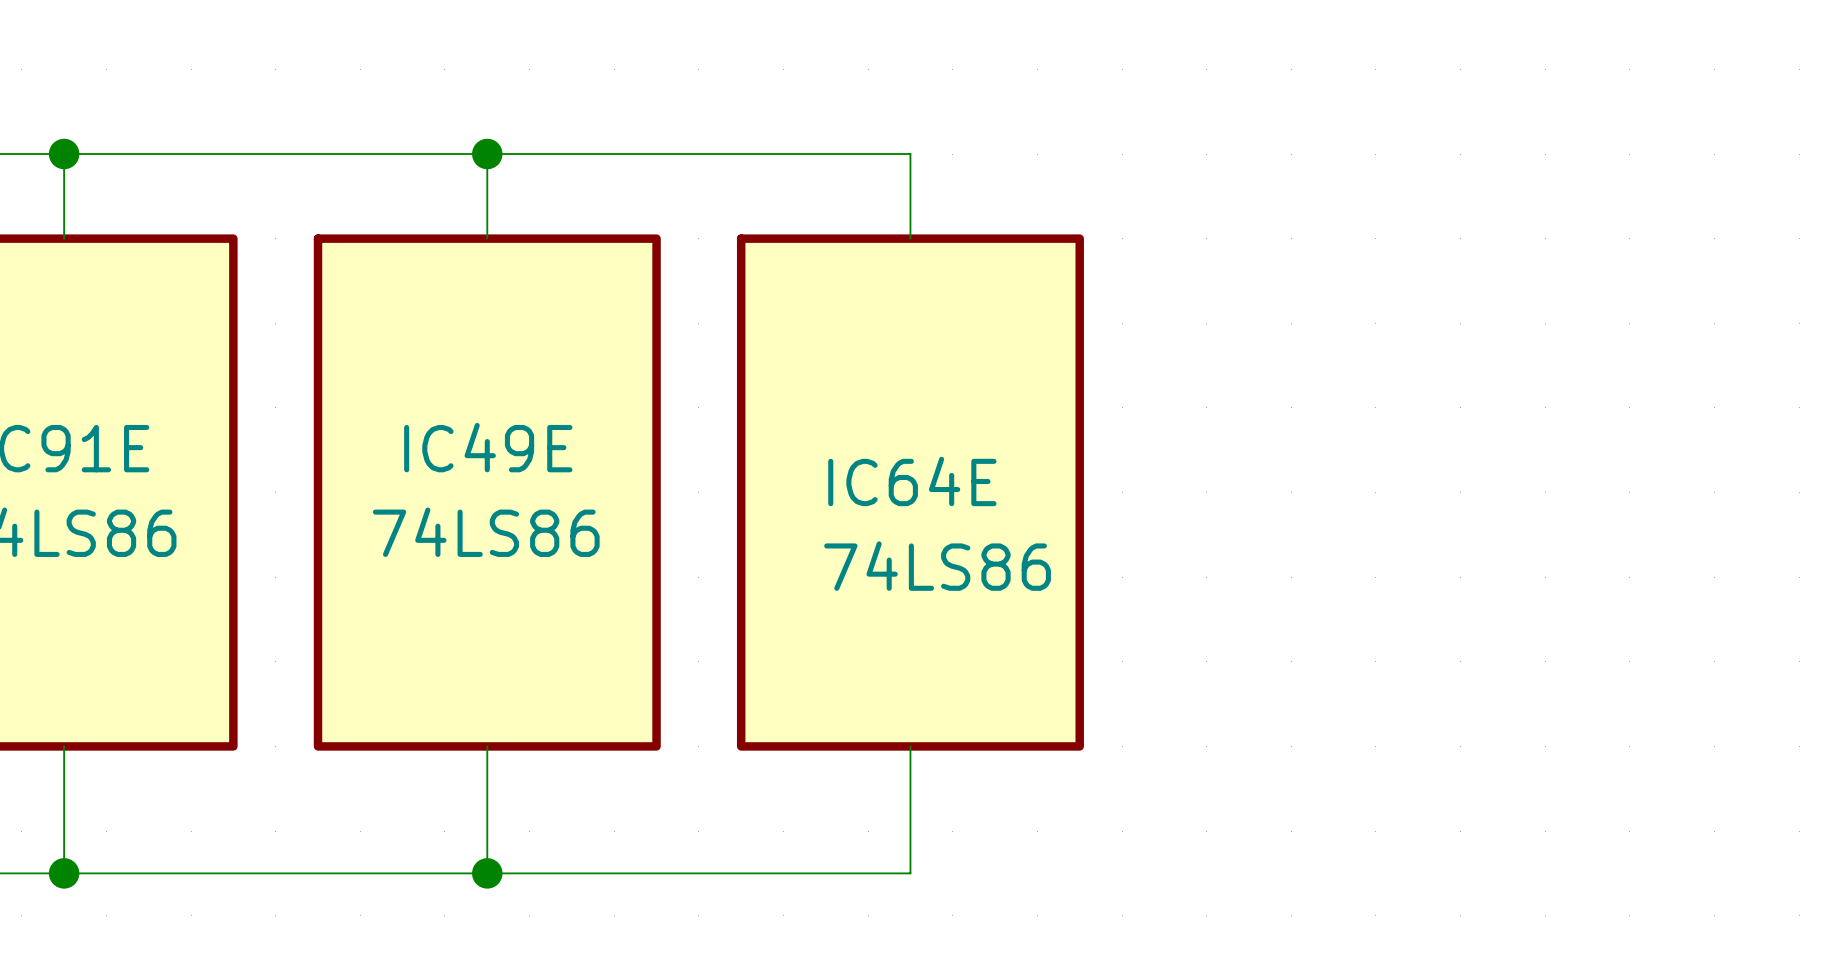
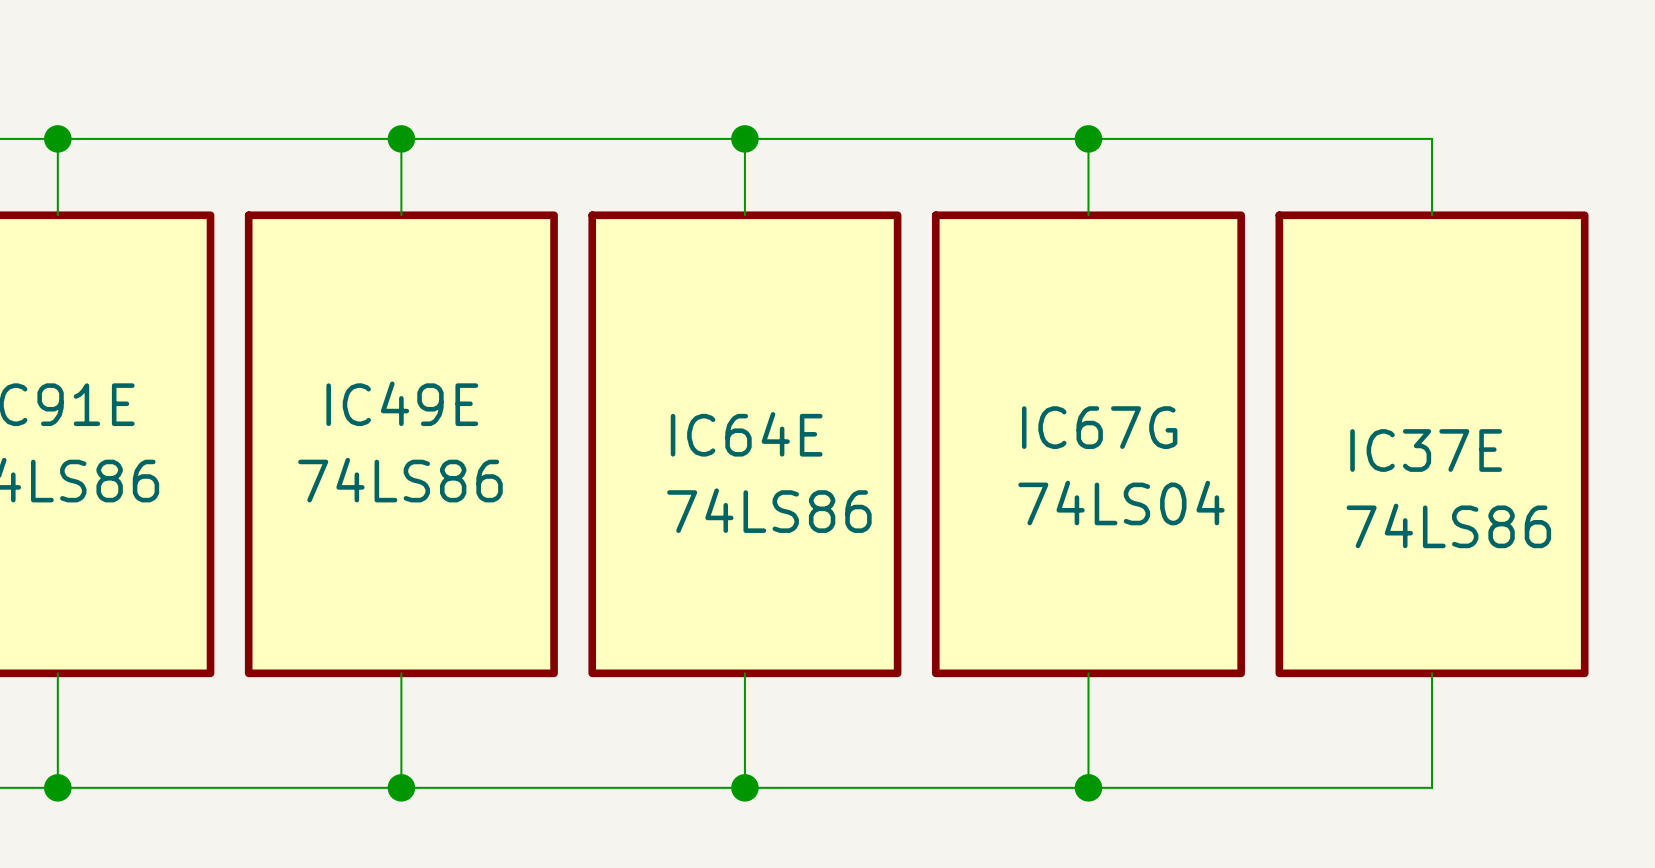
wire: (487, 154) (487, 238) -> (401, 138) (401, 215)
junction position: (487, 154) -> (401, 138)
wire: none -> (744, 138) (744, 215)
junction: none -> (744, 138)
wire: (910, 154) (910, 238) -> (821, 138) (1432, 138) (1432, 215)
wire: none -> (1088, 138) (1088, 215)
junction: none -> (1088, 138)
IC49E position: (487, 492) -> (401, 444)
IC64E position: (910, 492) -> (744, 444)
IC67G: none -> 74LS04 (1088, 444)
IC37E: none -> 74LS86 (1432, 444)
wire: (487, 746) (487, 873) -> (401, 673) (401, 787)
wire: none -> (744, 673) (744, 787)
wire: (910, 746) (910, 873) -> (1432, 673) (1432, 787) (821, 787)
wire: none -> (1088, 673) (1088, 787)
junction position: (487, 873) -> (401, 787)
junction: none -> (744, 787)
junction: none -> (1088, 787)

